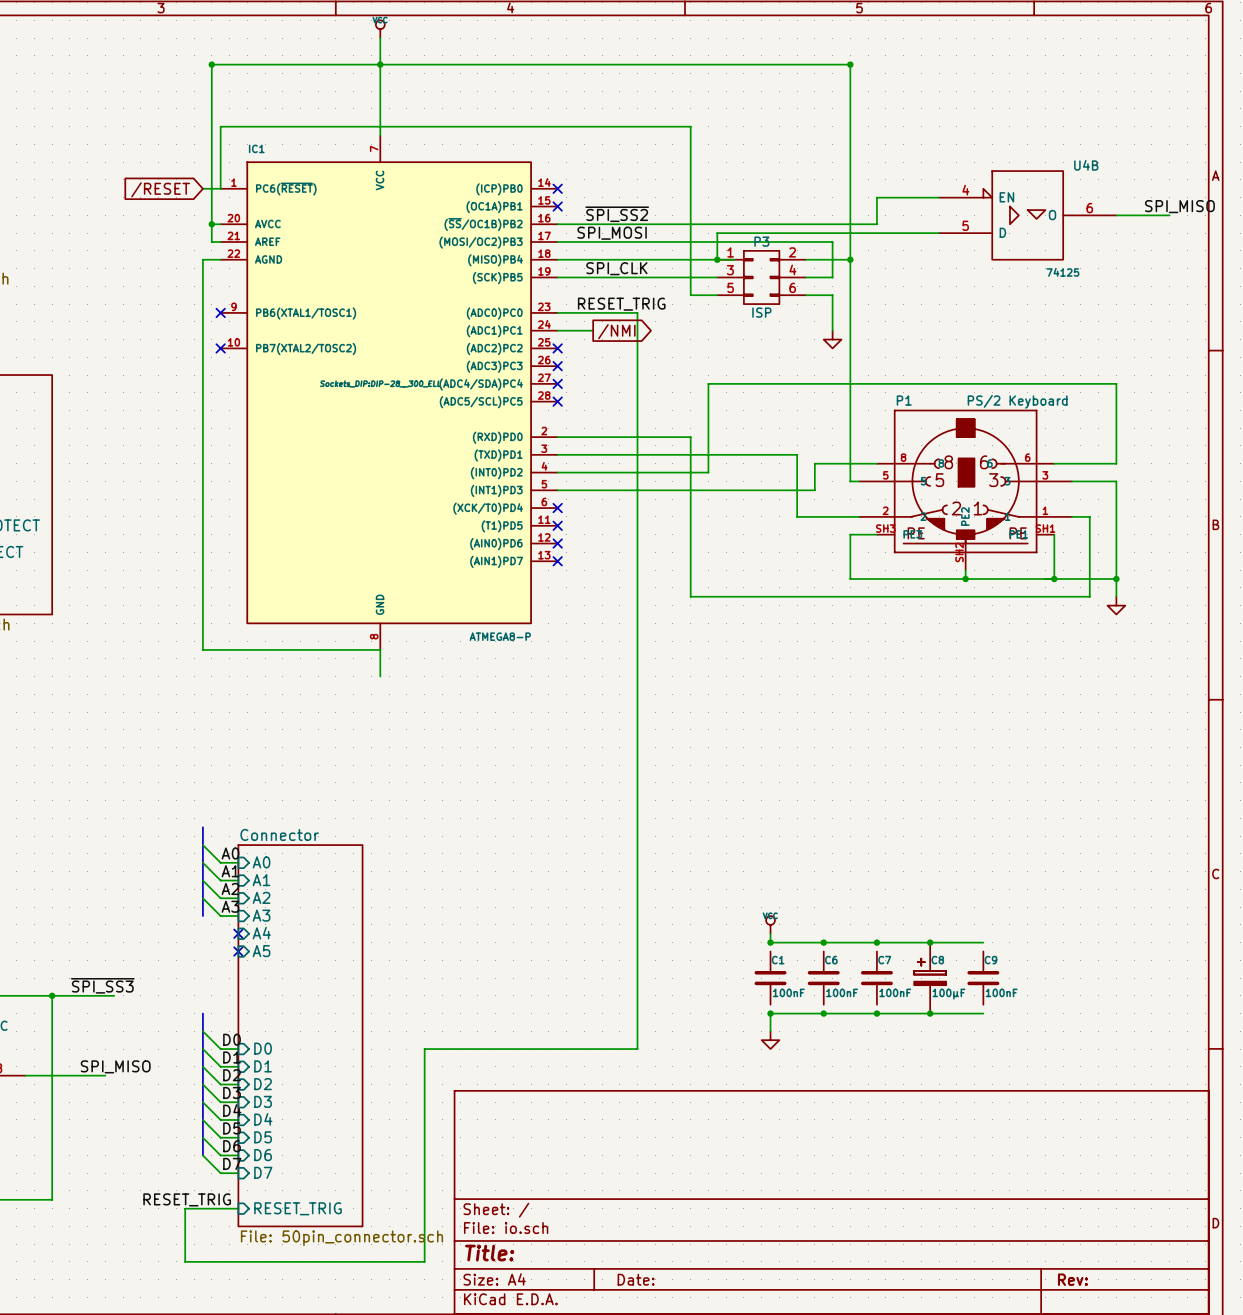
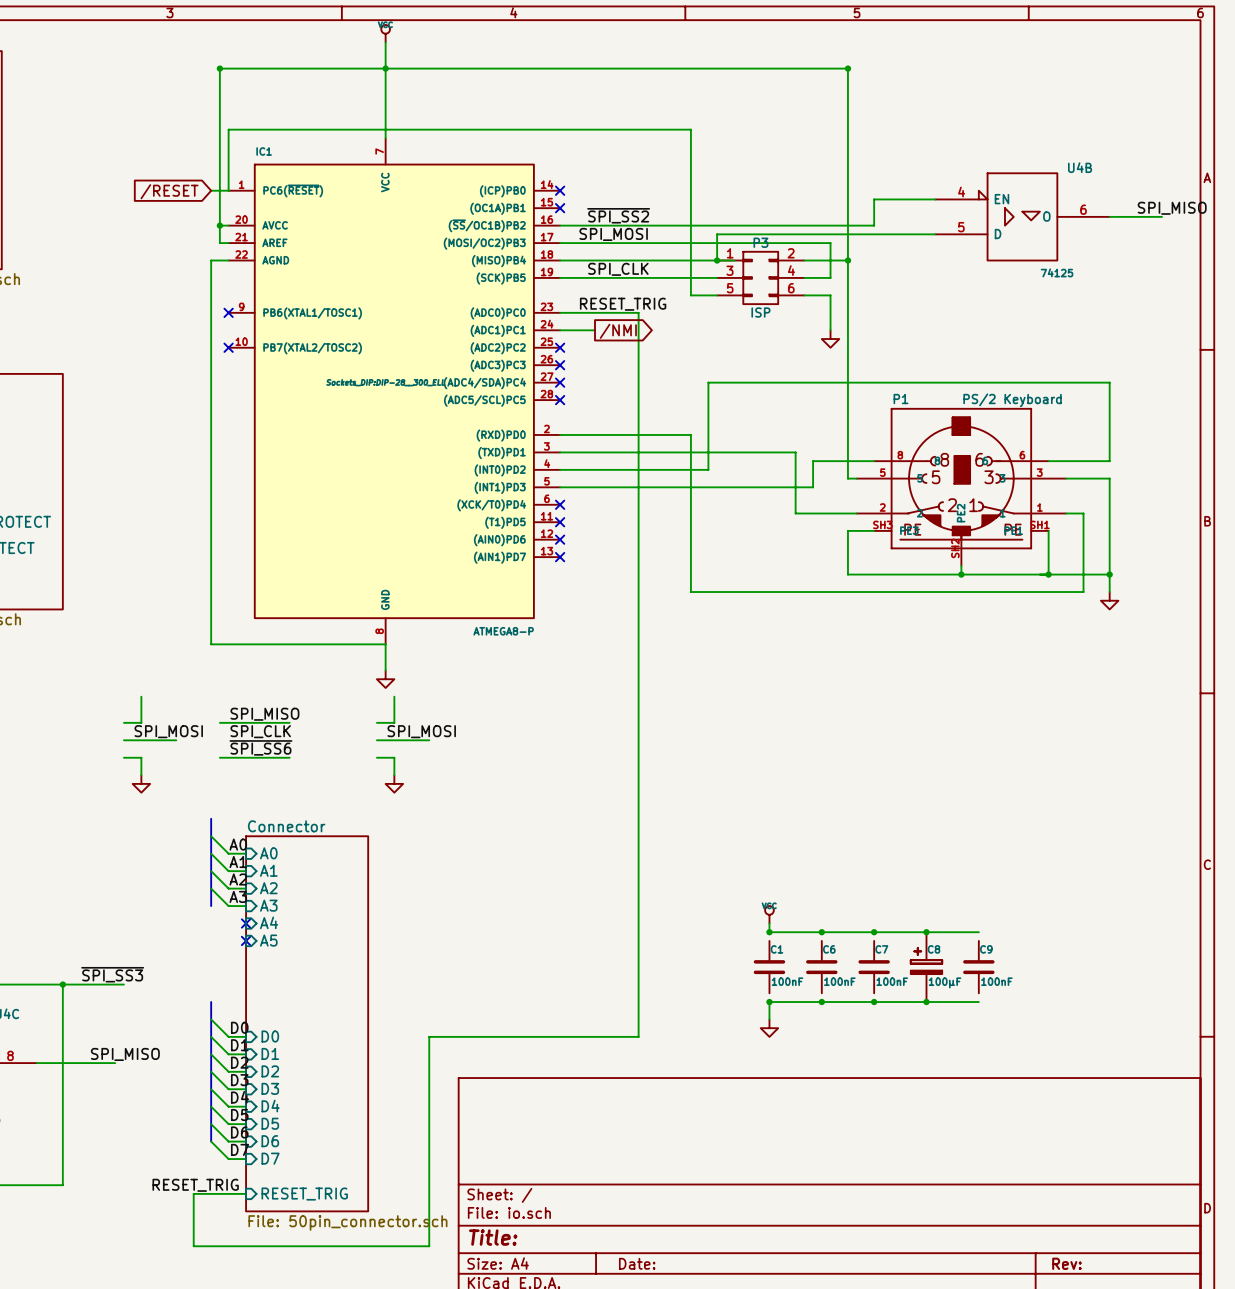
power symbol: none -> (385, 679)
wire: none -> (141, 696) (141, 722) (123, 722)
wire: none -> (394, 696) (394, 722) (376, 722)
label: none -> SPI_MISO (264, 714)
wire: none -> (219, 722) (289, 722)
label: none -> SPI_MOSI (168, 731)
label: none -> SPI_CLK (260, 731)
label: none -> SPI_MOSI (421, 731)
wire: none -> (123, 740) (176, 740)
wire: none -> (376, 740) (429, 740)
label: none -> ~{SPI_SS6} (260, 747)
wire: none -> (123, 757) (141, 757) (141, 775)
wire: none -> (219, 757) (289, 757)
wire: none -> (376, 757) (394, 757) (394, 775)
power symbol: none -> (141, 783)
power symbol: none -> (394, 783)

